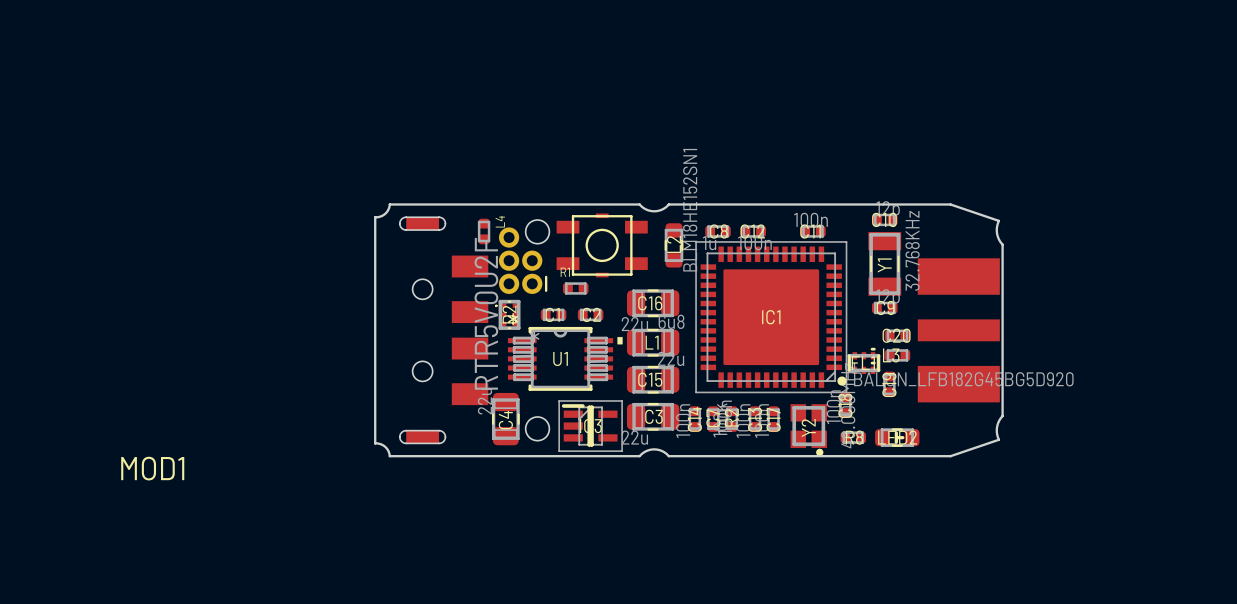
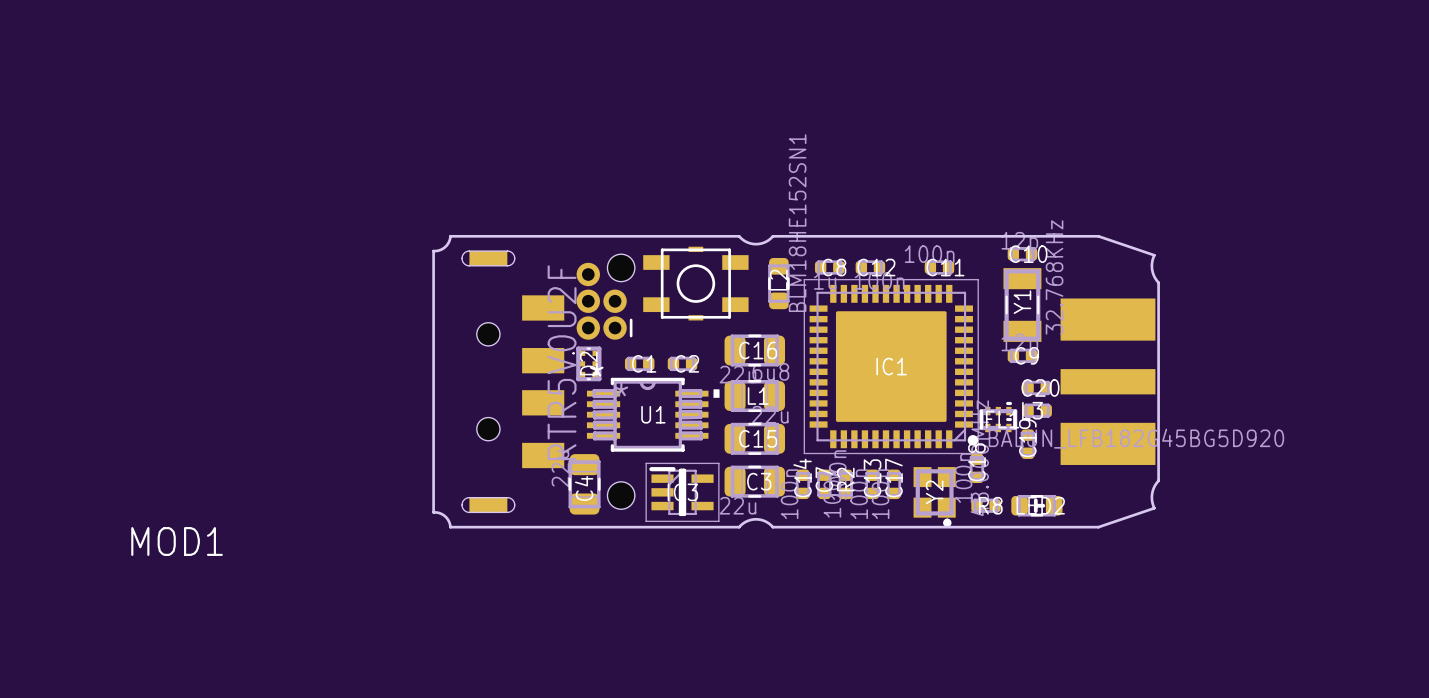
L4: (484, 231) -> none
R1: (575, 288) -> none

